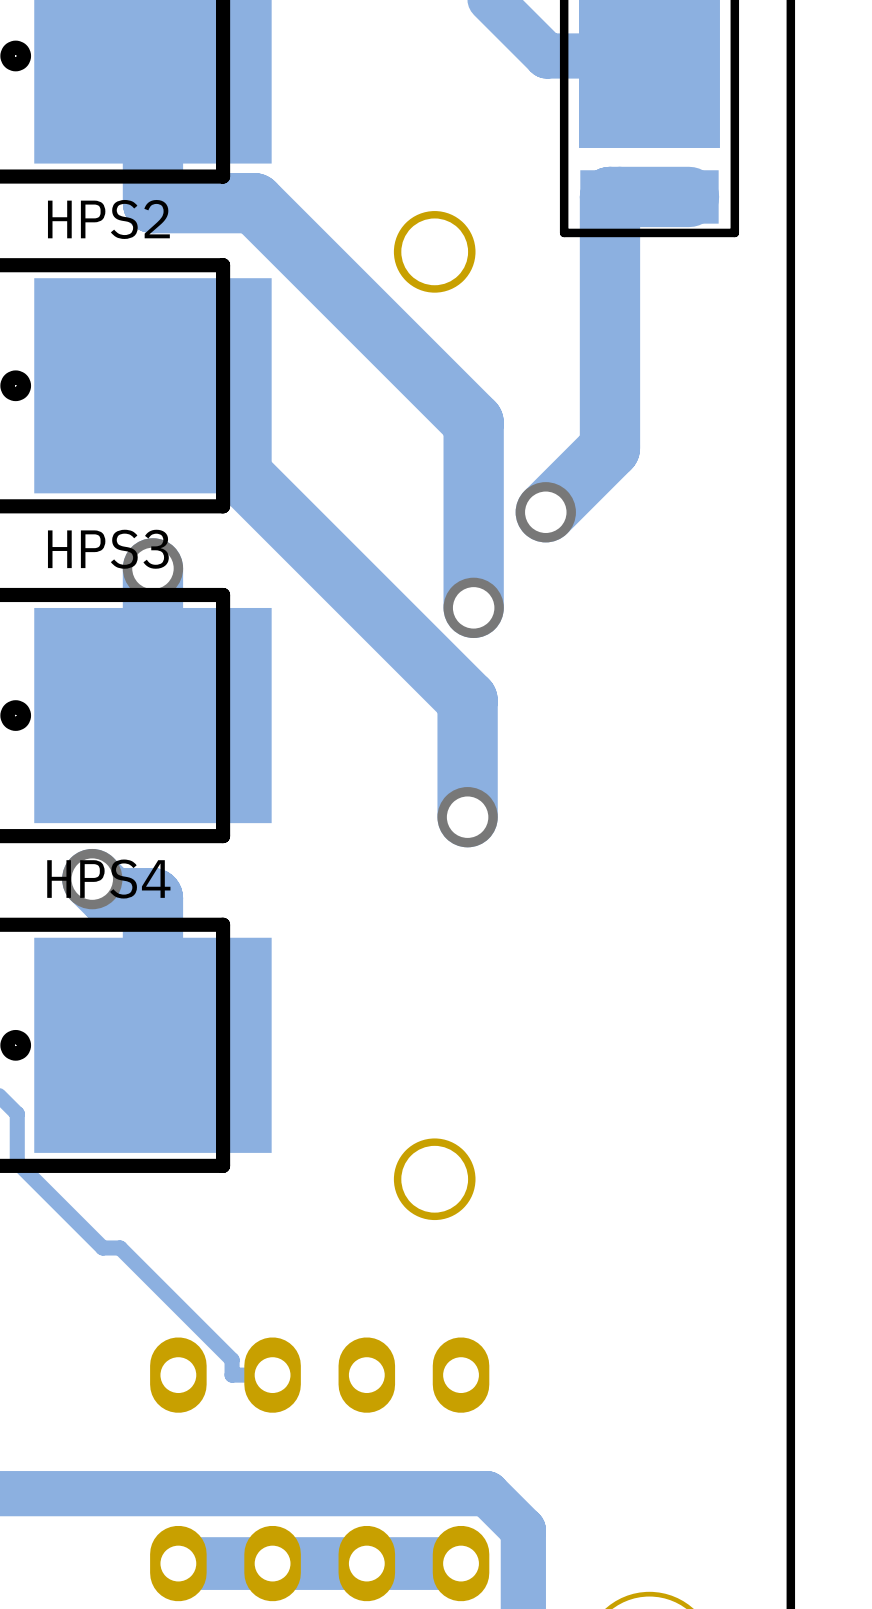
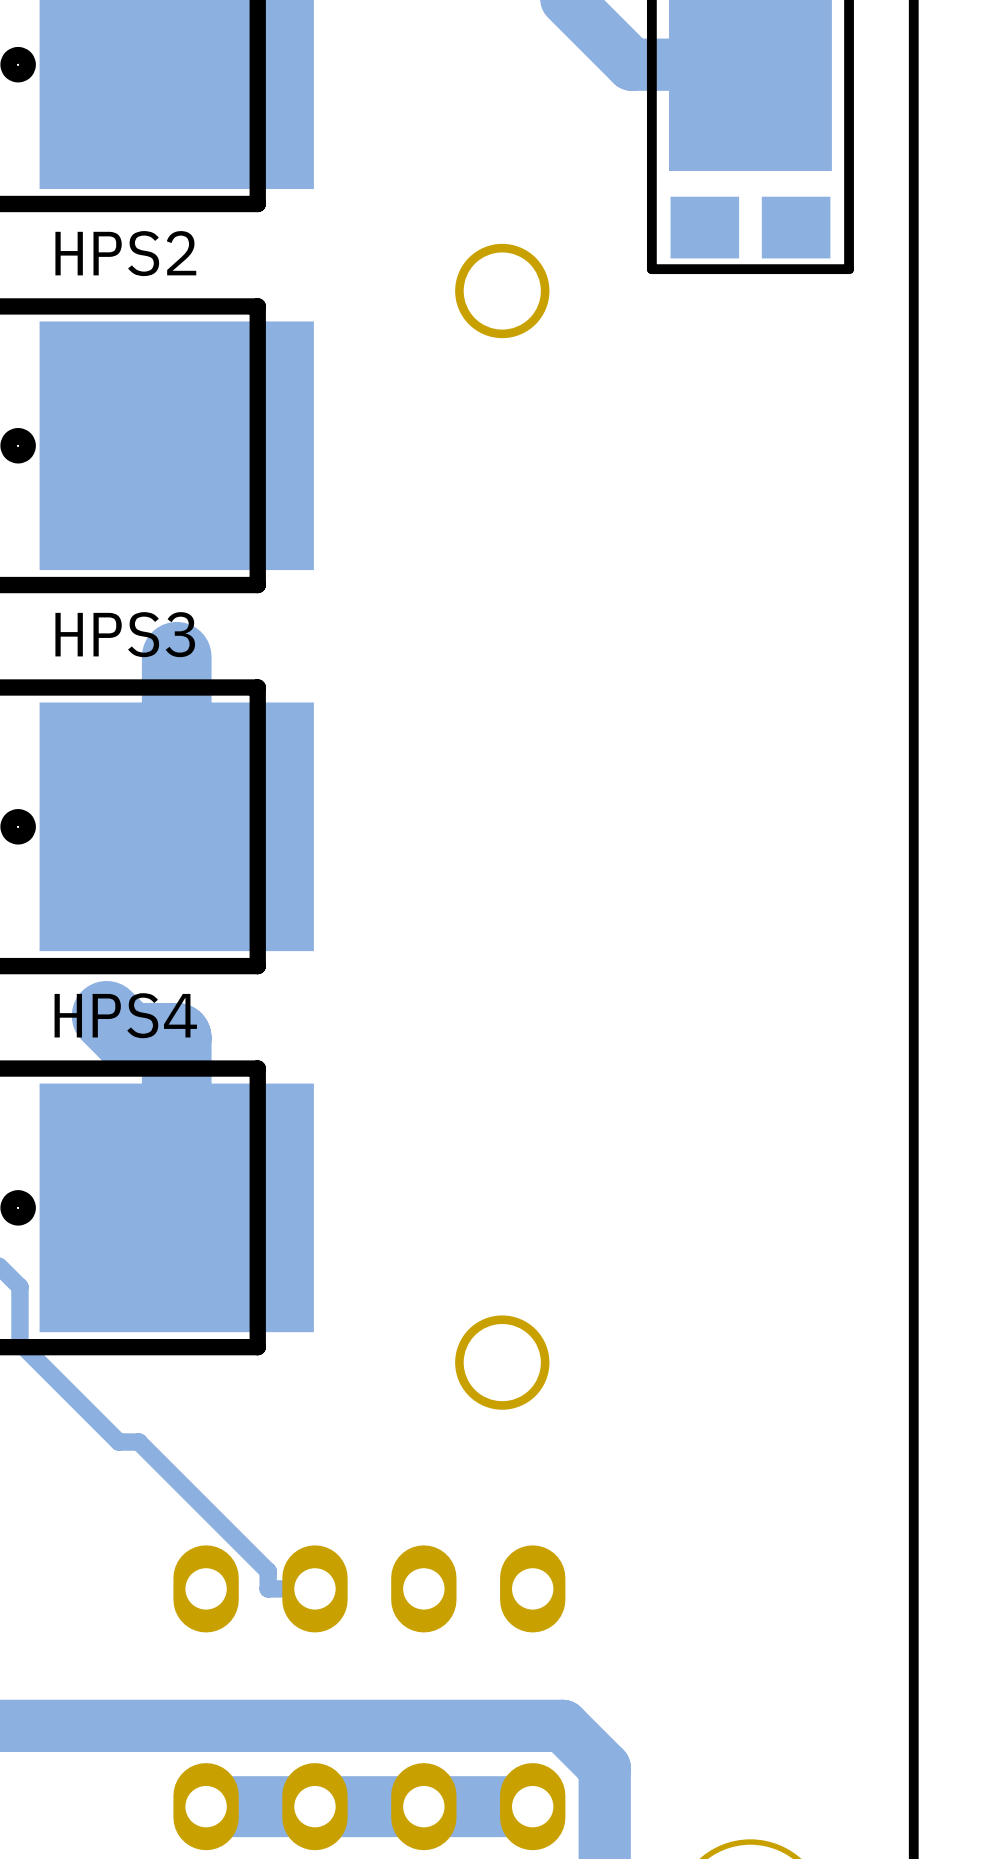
track: (152, 55) (152, 203) (254, 203) (473, 422) (473, 607) -> none
track: (688, 196) (609, 196) (609, 448) (545, 512) -> none
track: (152, 385) (467, 700) (467, 817) -> none
via: (545, 512) -> none
via: (152, 568) -> none
via: (473, 607) -> none
via: (467, 817) -> none
via: (92, 879) -> none

